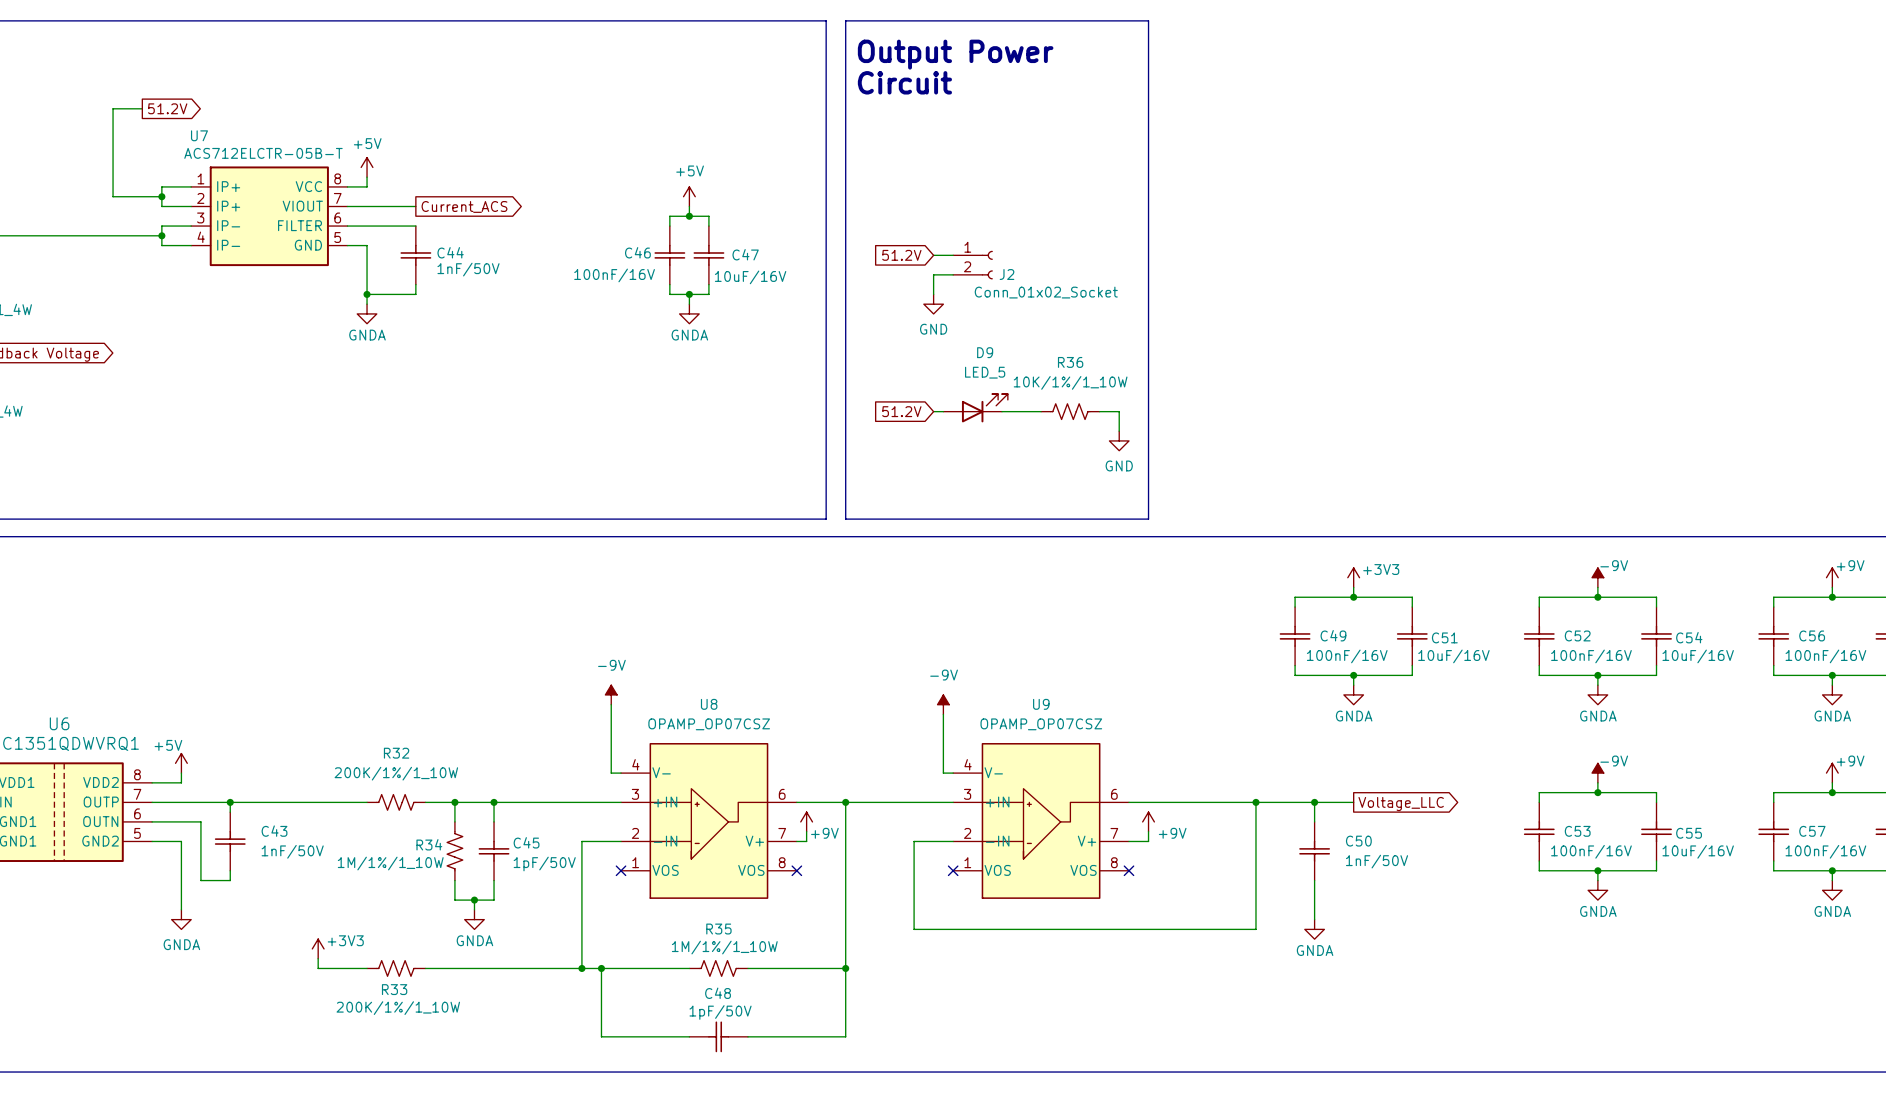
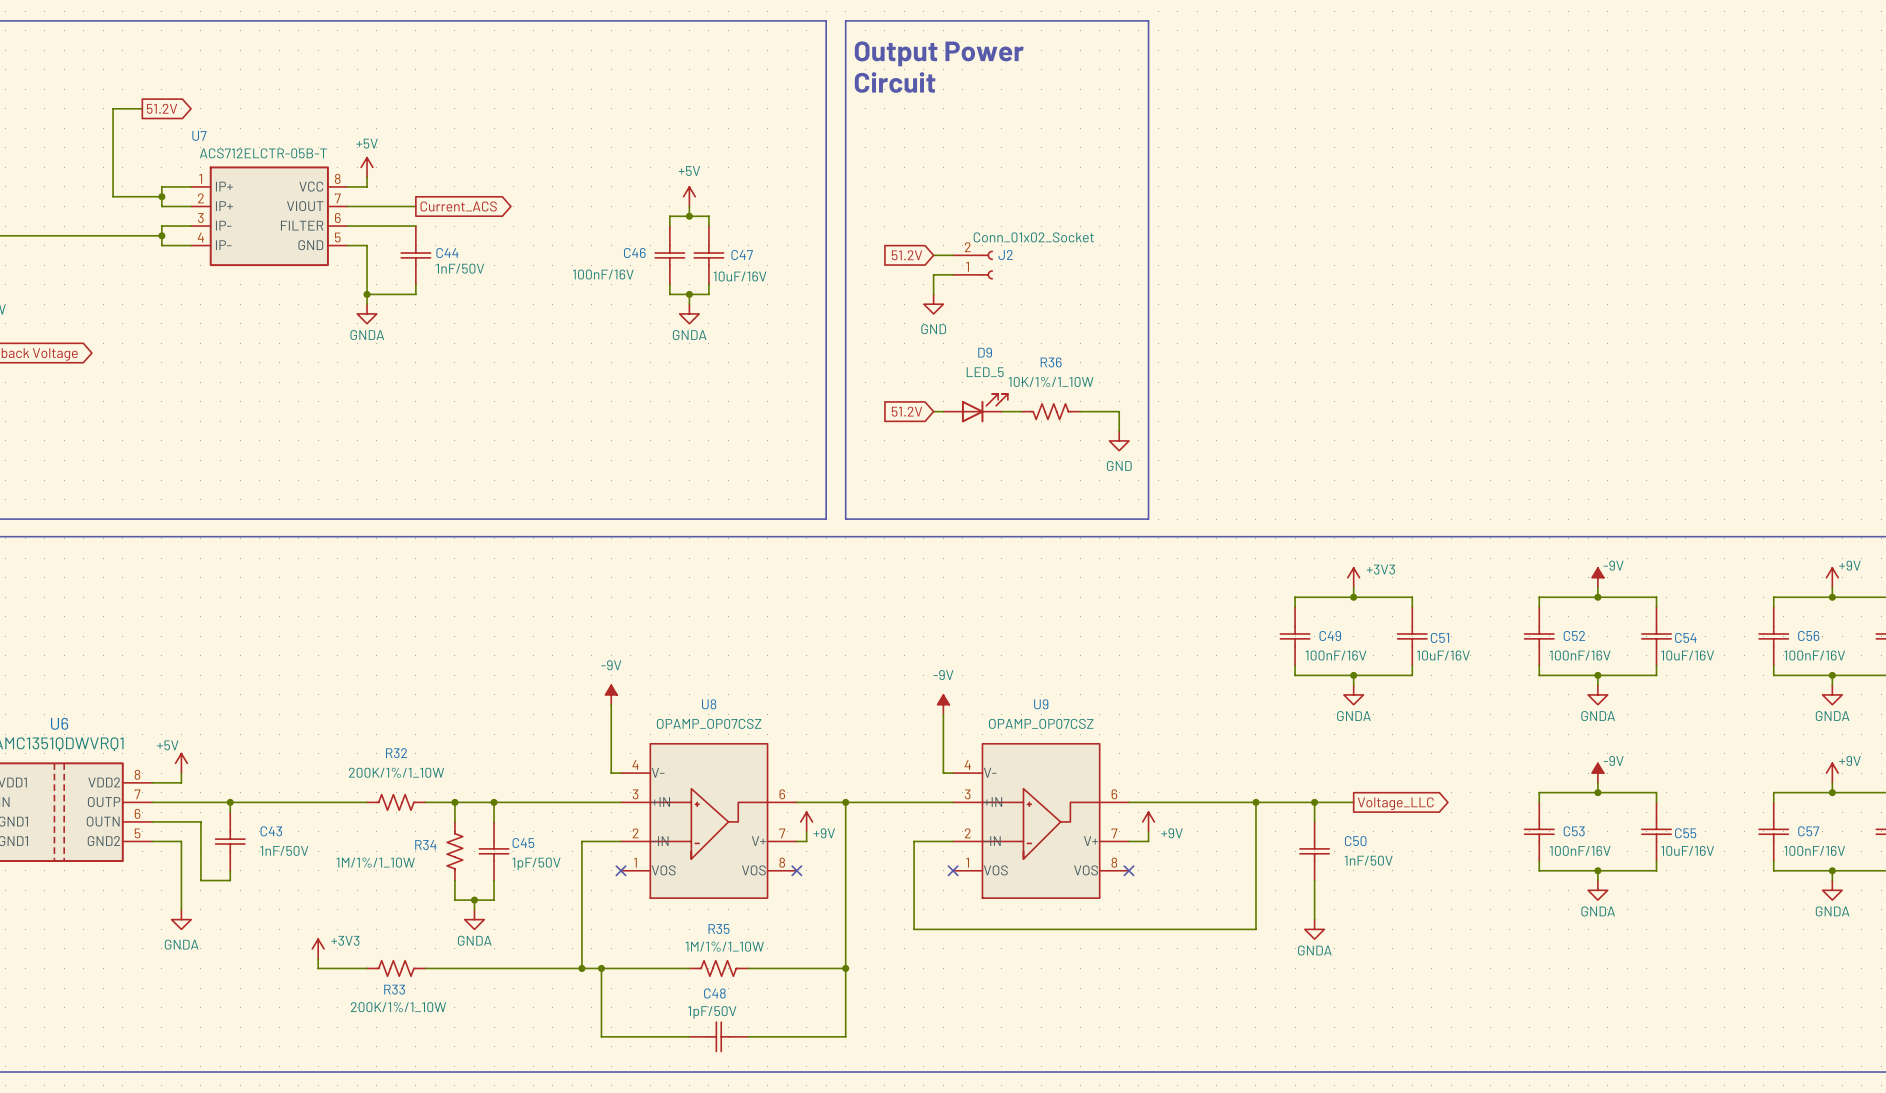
J2 flip: as is (987, 265) -> up-down (987, 265)
R36 flip: as is (1070, 411) -> left-right (1050, 411)

